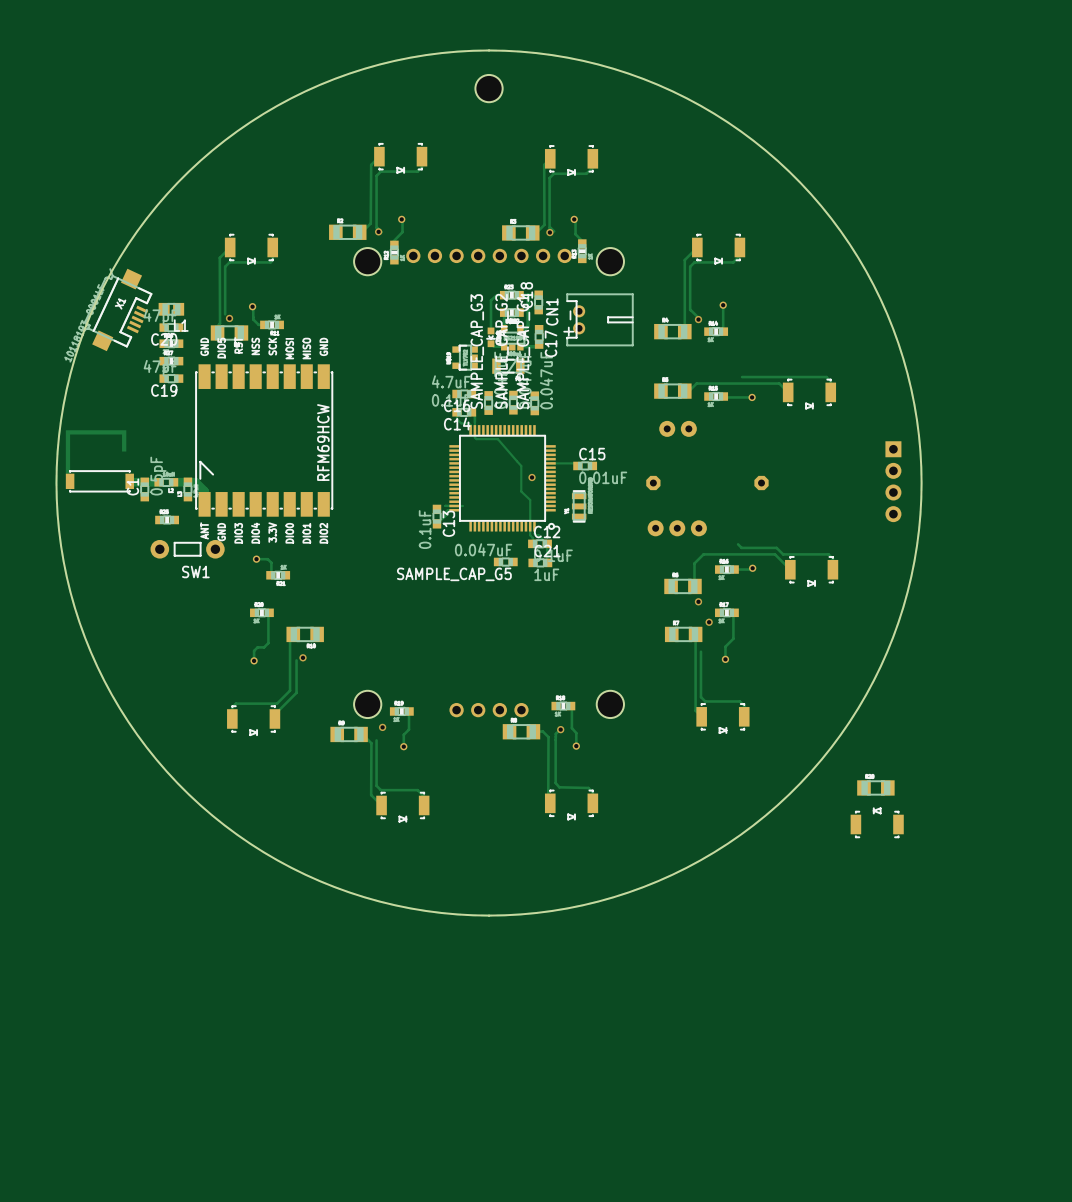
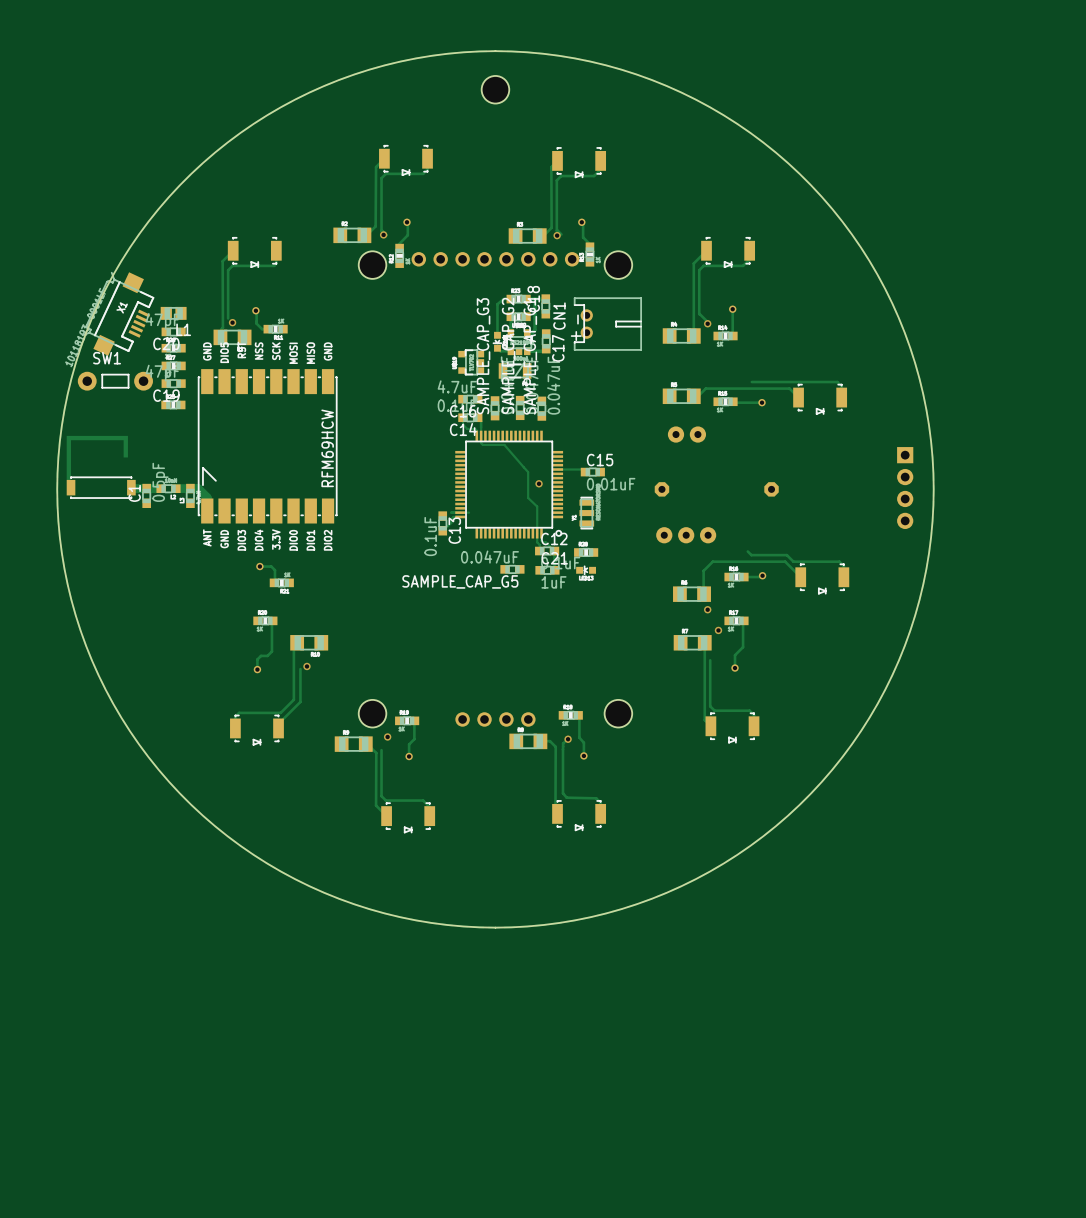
part position: (167, 520) -> (173, 404)
SW1 position: (187, 549) -> (115, 381)
part: none -> (586, 570)
SW1 name position: SW1 (195, 571) -> SW1 (107, 358)
part footprint: [857, 780, 895, 796] -> [574, 548, 599, 557]
part: (877, 822) -> none

